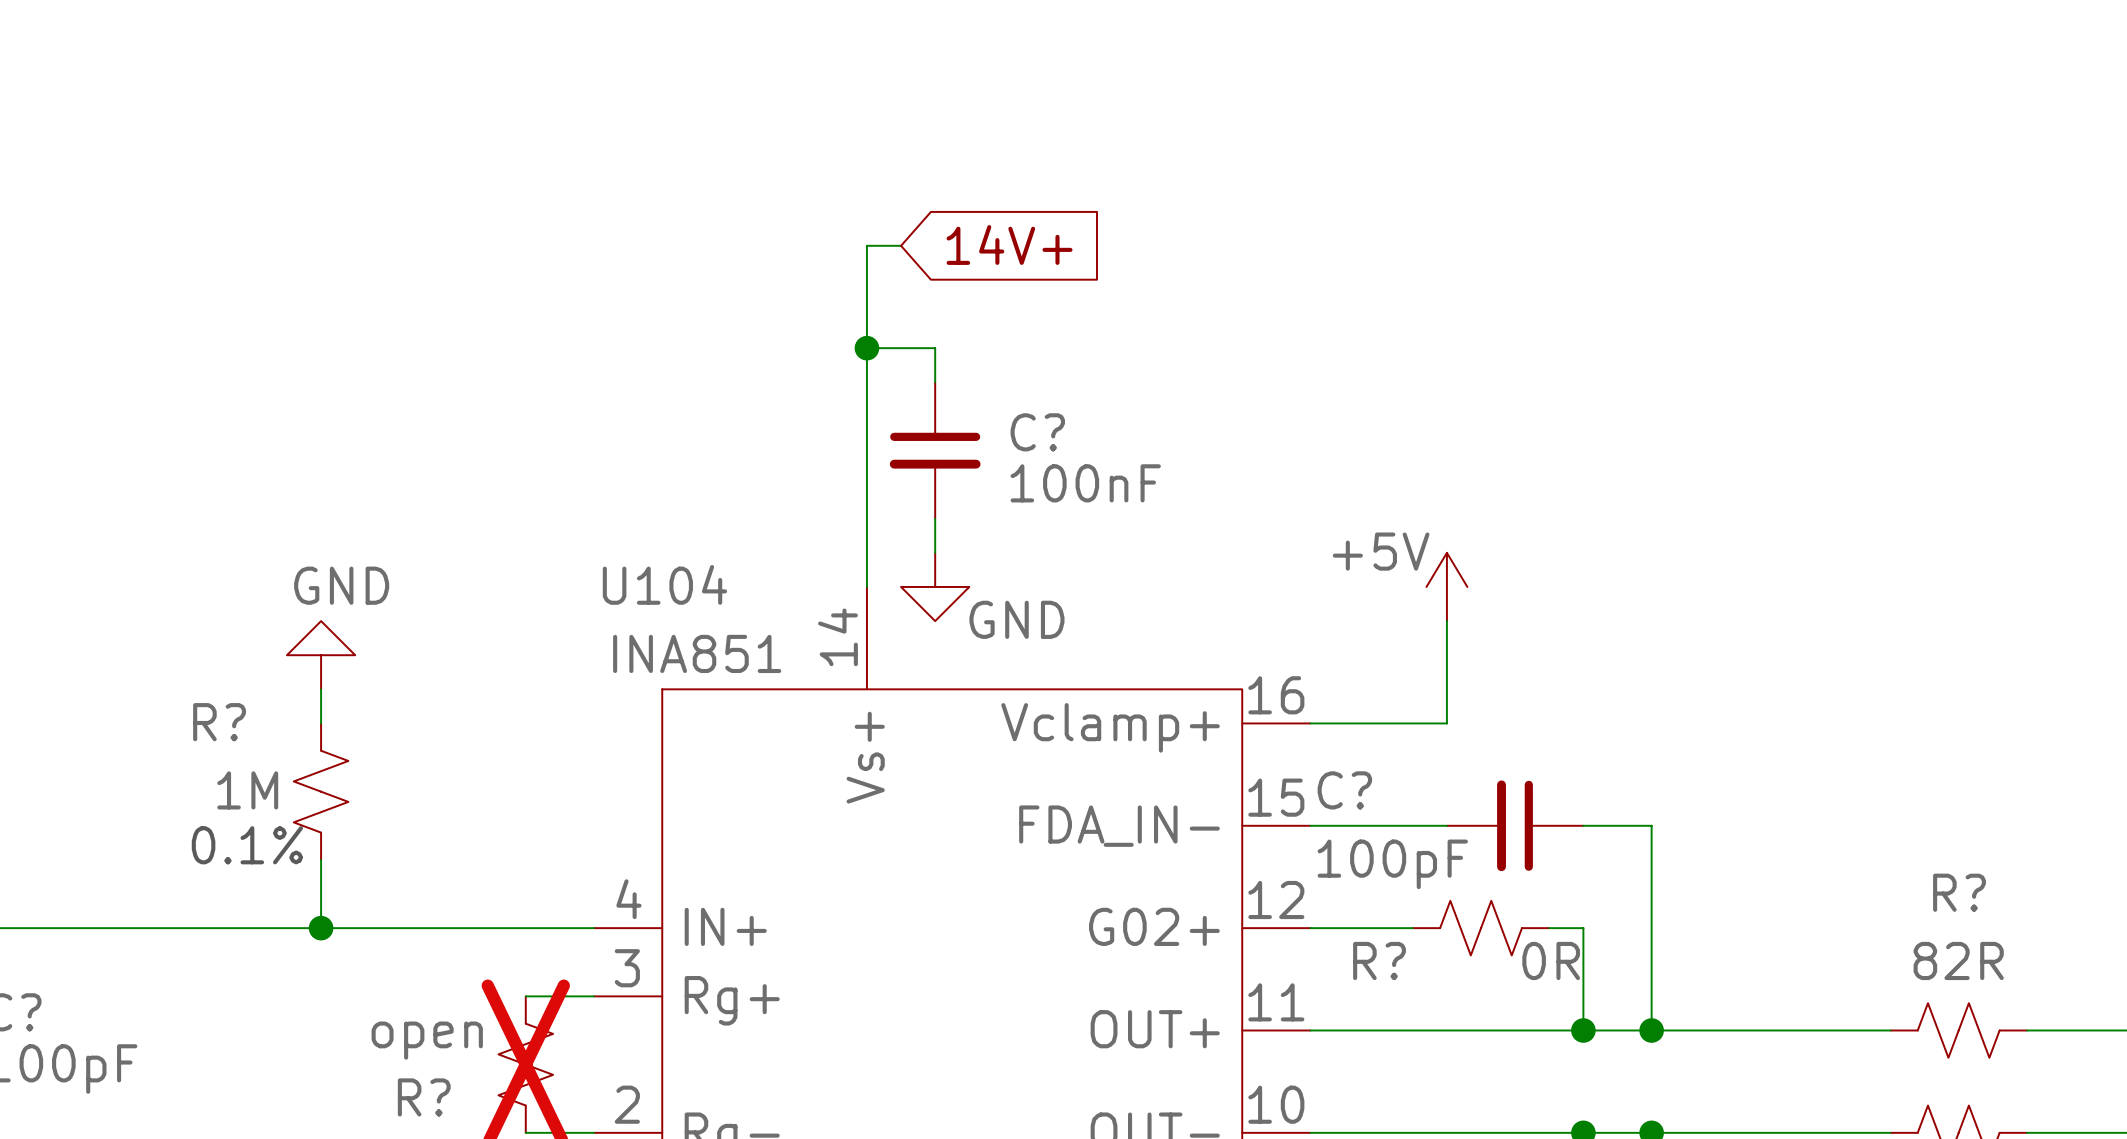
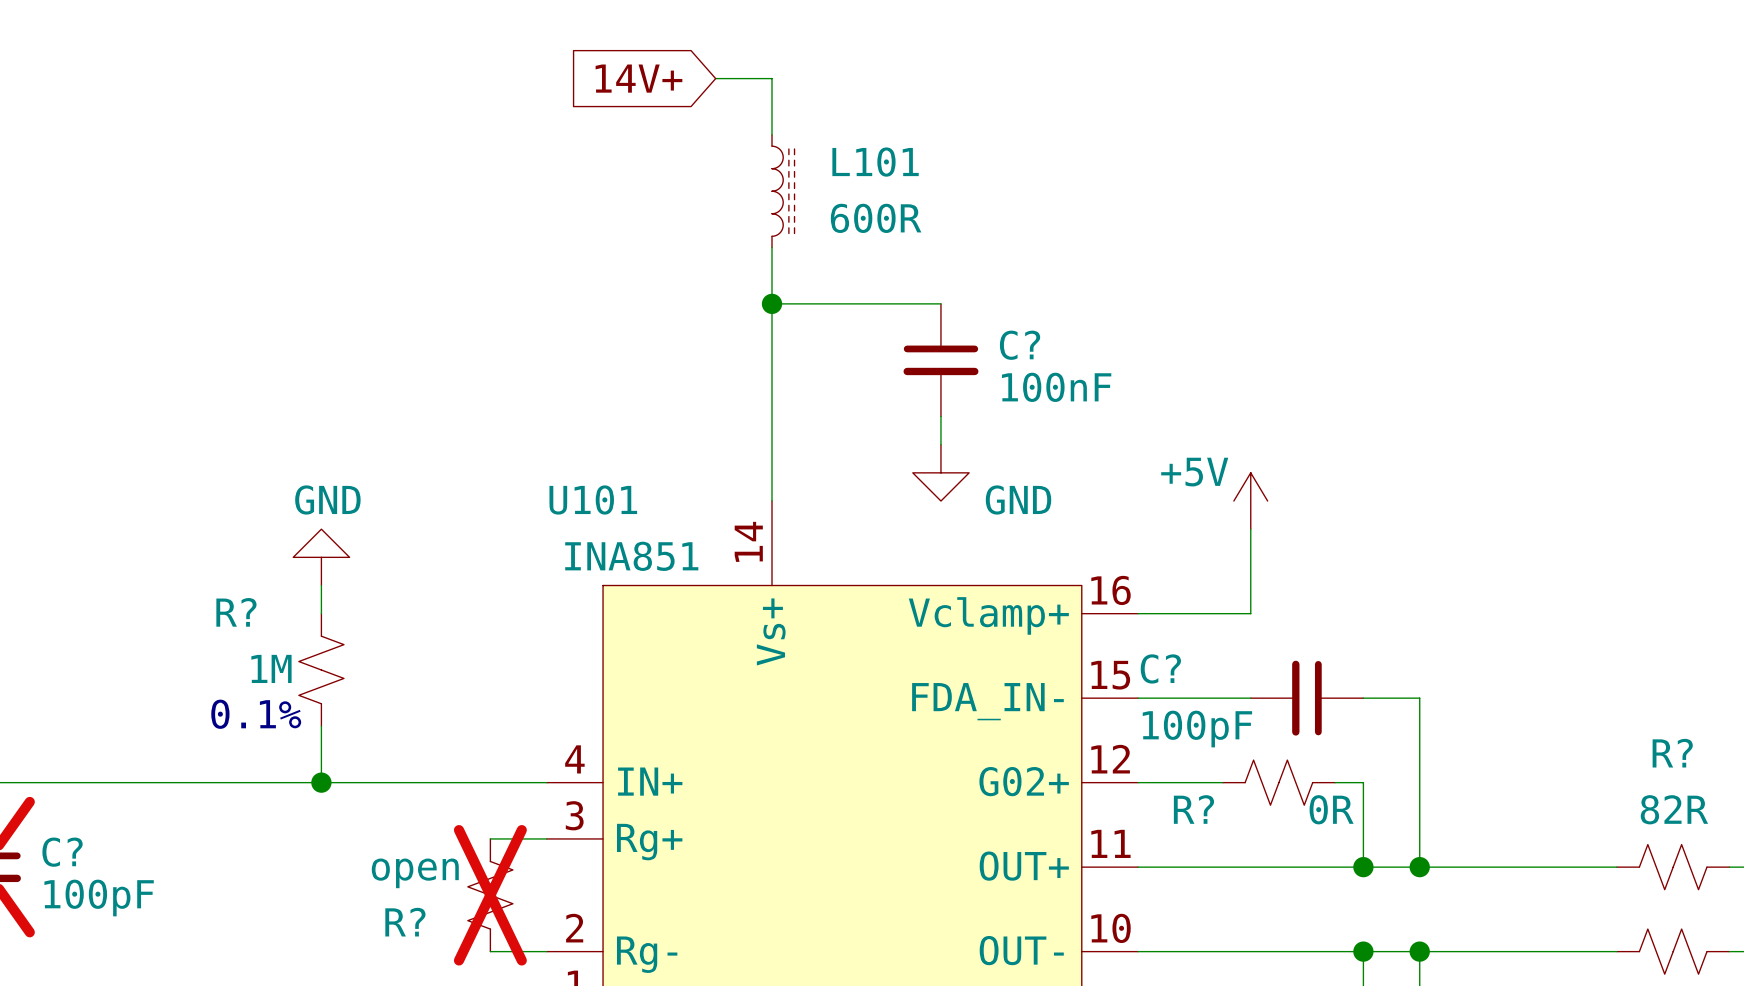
wire: none -> (715, 78) (772, 78) (772, 134)
L101: none -> 600R (783, 191)
wire: (901, 245) (866, 245) (866, 279) -> none
global label rotation: 0° (1009, 245) -> 180° (638, 78)
global label position: 14V+ (1009, 245) -> 14V+ (638, 78)
wire: (935, 348) (935, 382) -> (828, 303) (940, 303)
C? position: (935, 450) -> (940, 360)
wire: (935, 518) (935, 552) -> (940, 416) (940, 444)
U104 name: U104 (664, 584) -> U101 (593, 499)
power symbol position: GND (935, 586) -> GND (940, 472)

